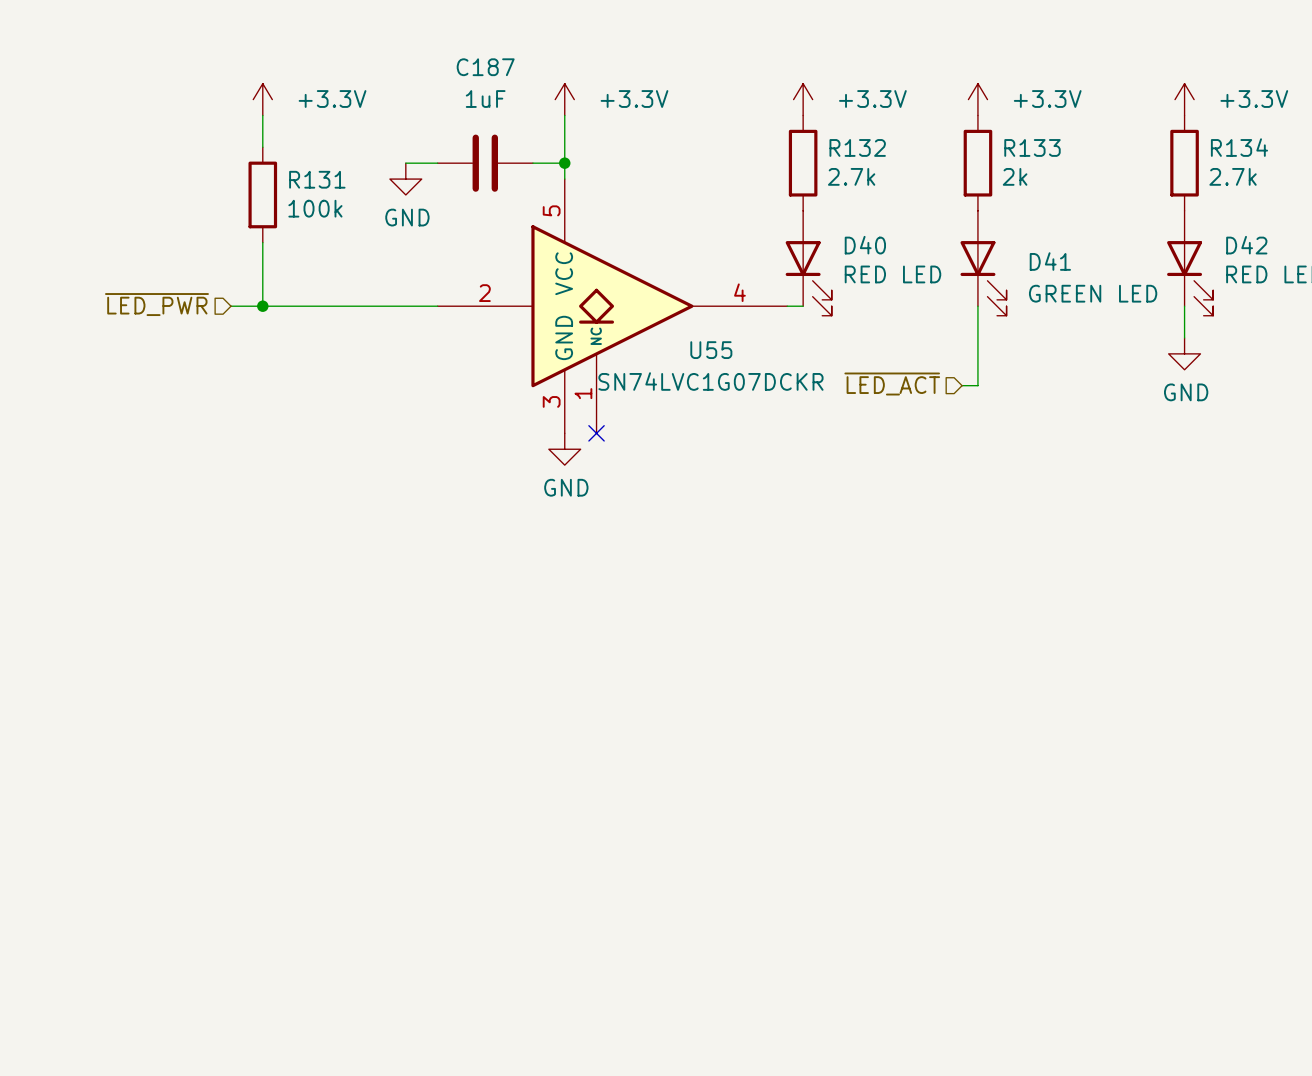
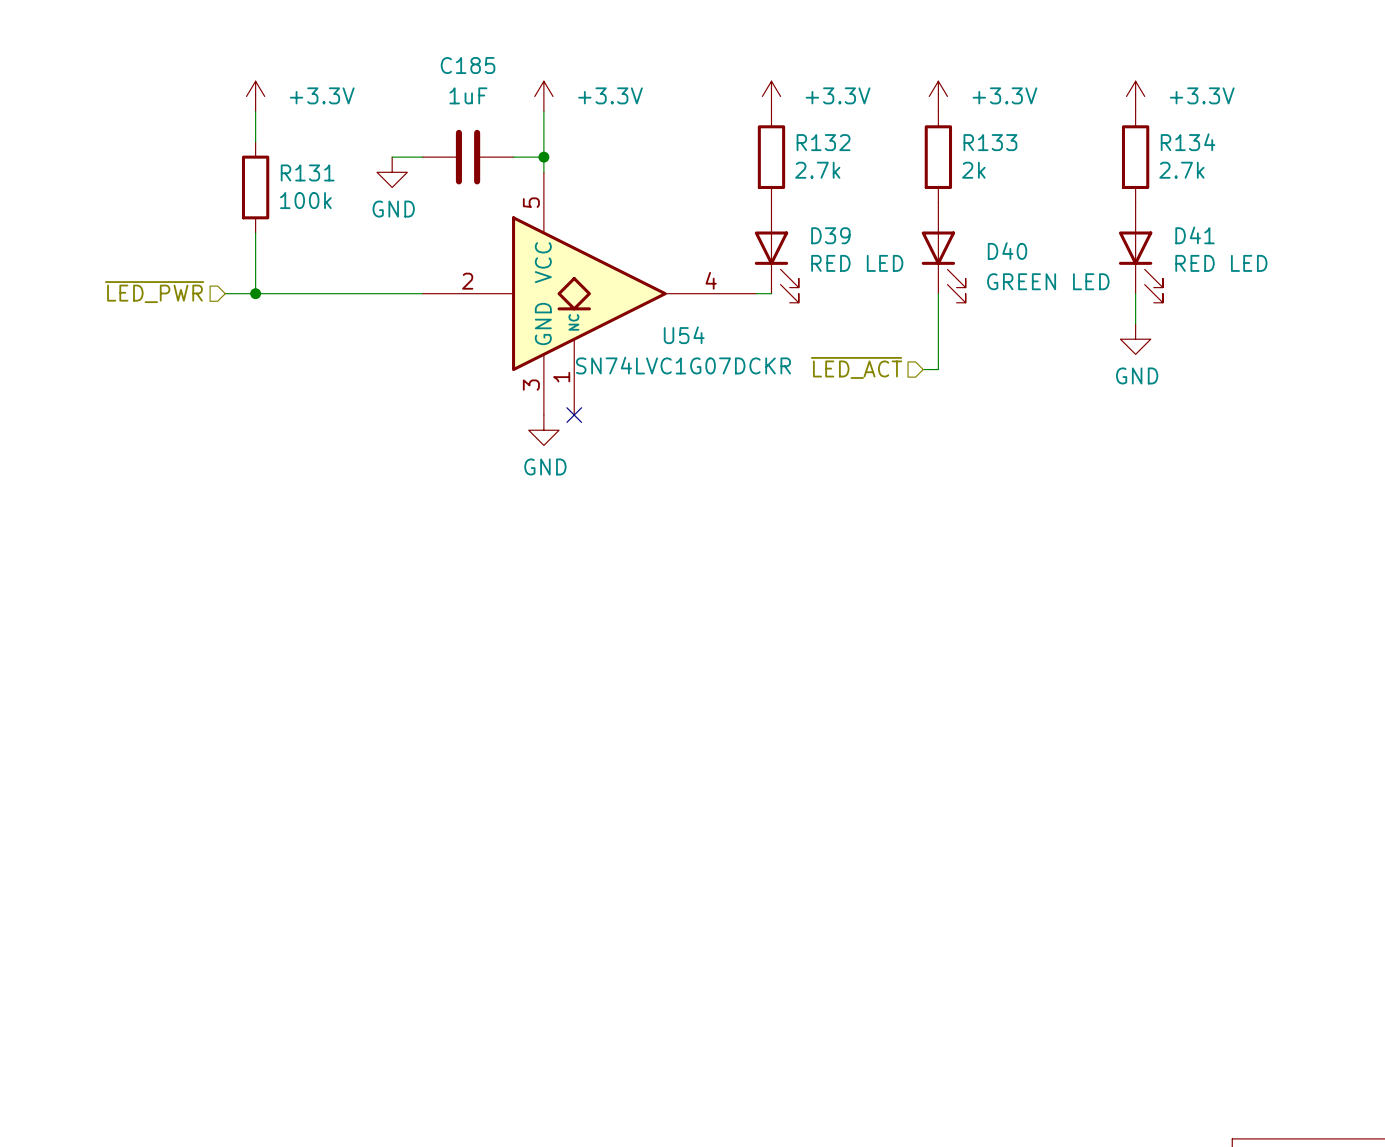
C187 name: C187 (485, 67) -> C185 (468, 65)
D40 name: D40 (865, 245) -> D39 (830, 235)
D42 name: D42 (1246, 245) -> D41 (1195, 235)
D41 name: D41 (1050, 261) -> D40 (1007, 251)
U55 name: U55 (711, 350) -> U54 (684, 335)

